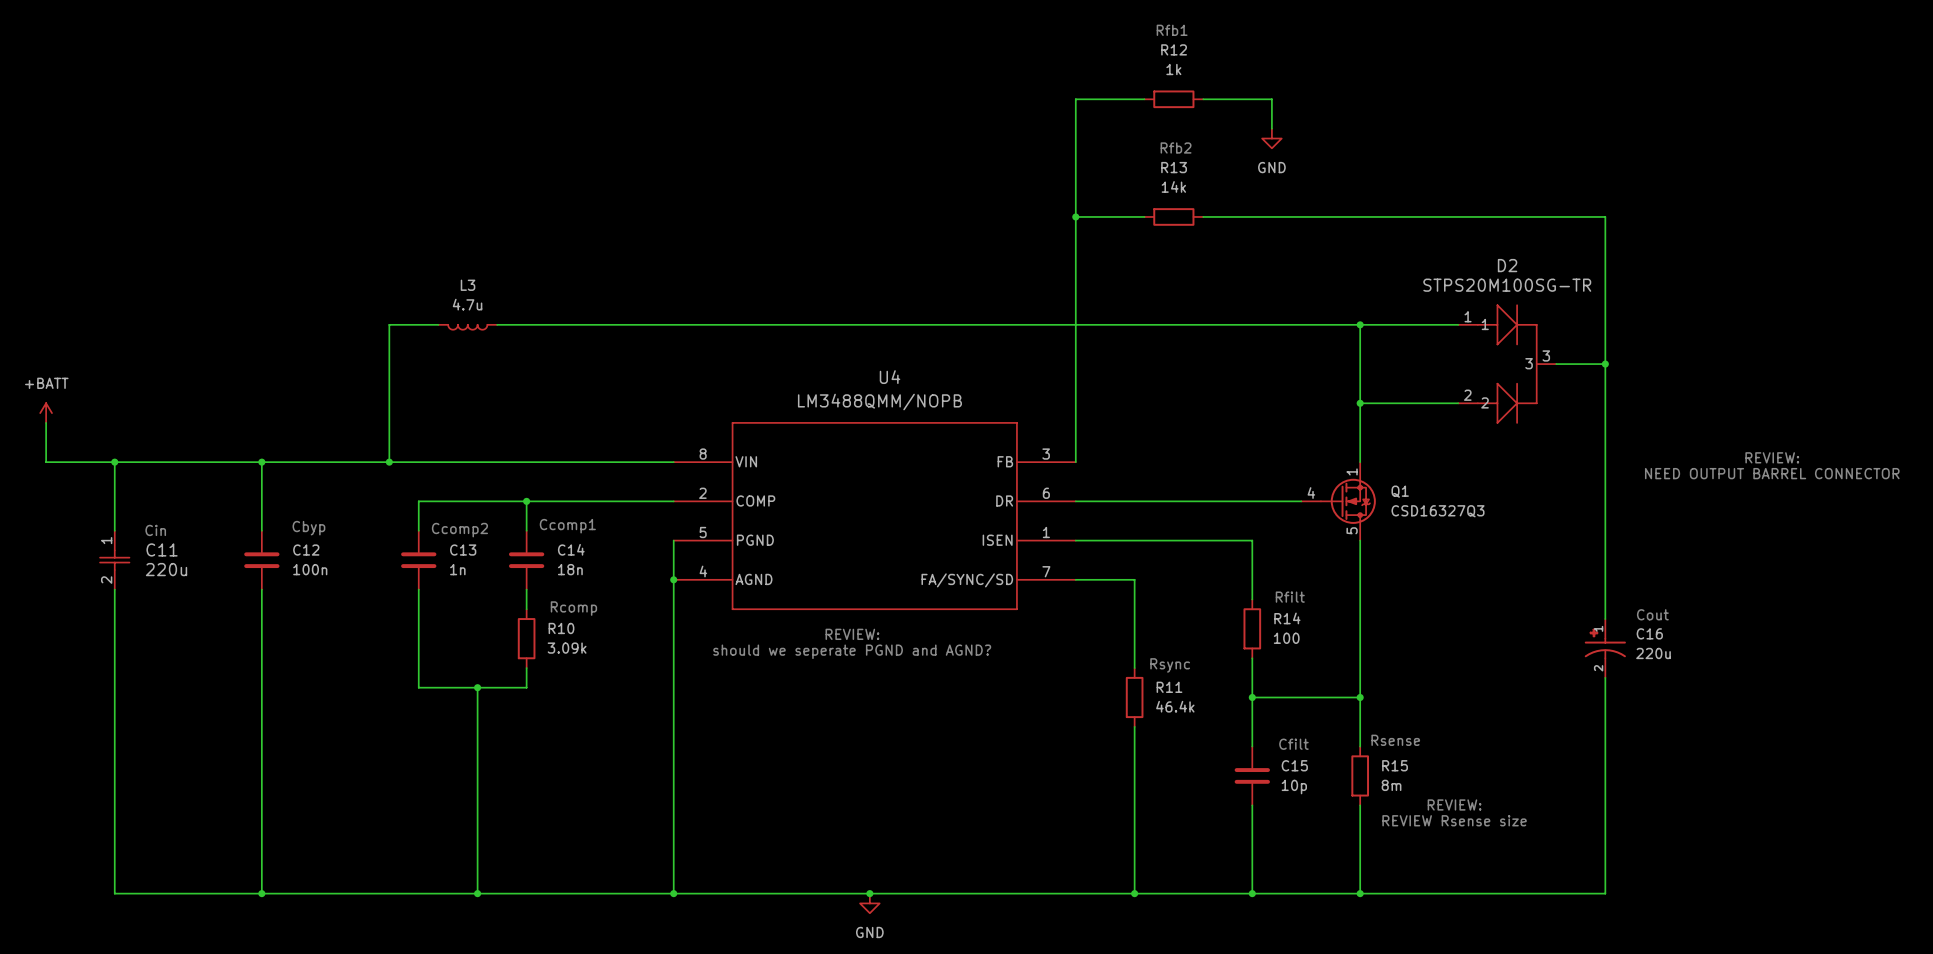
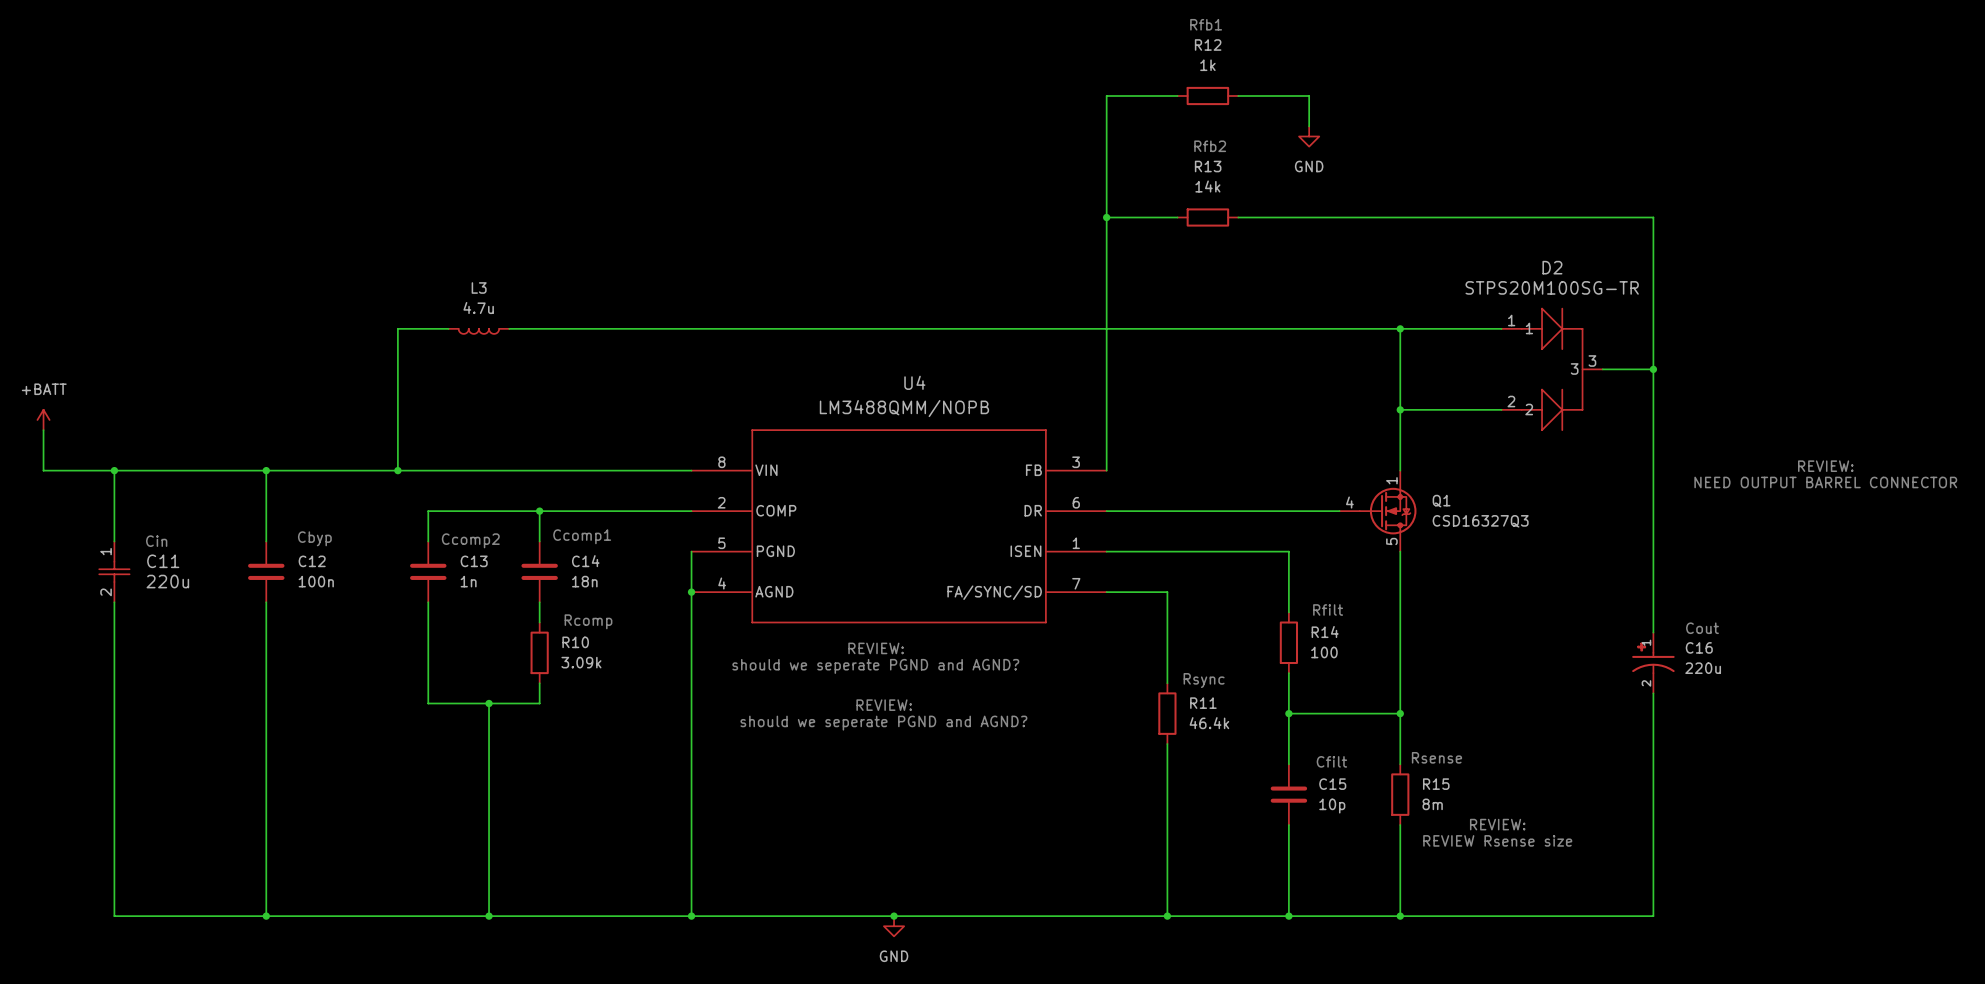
text: none -> REVIEW: (884, 705)
text: none -> should we seperate PGND and AGND? (883, 723)

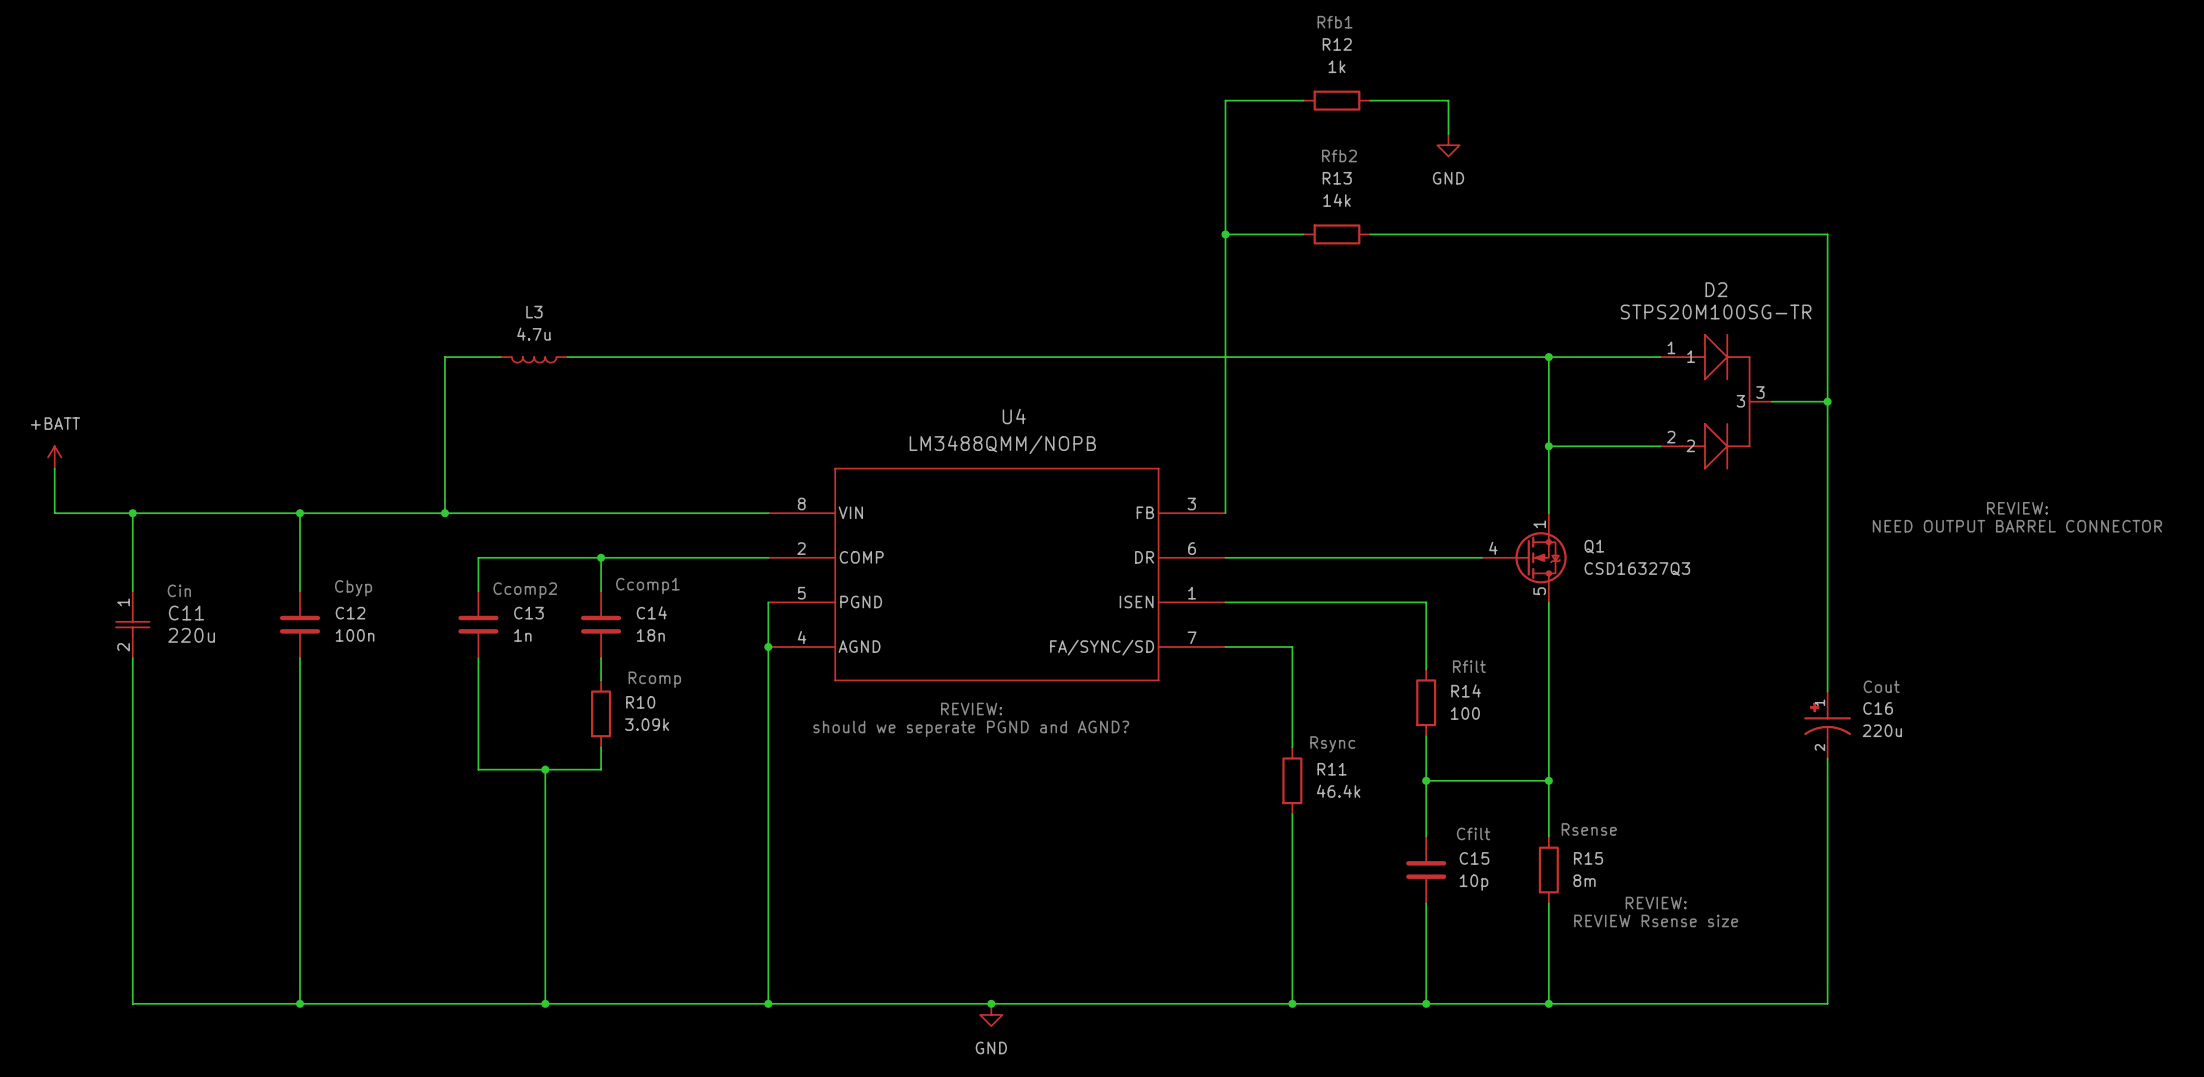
text: REVIEW: (884, 705) -> none
text: should we seperate PGND and AGND? (883, 723) -> none

